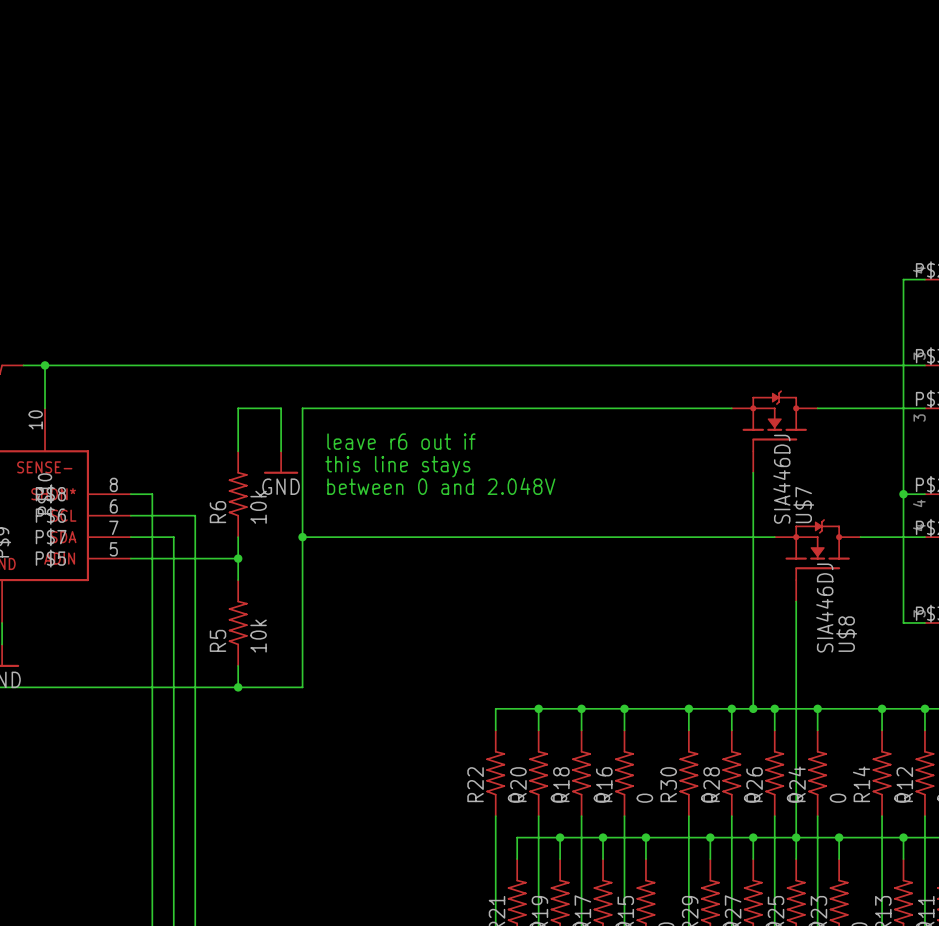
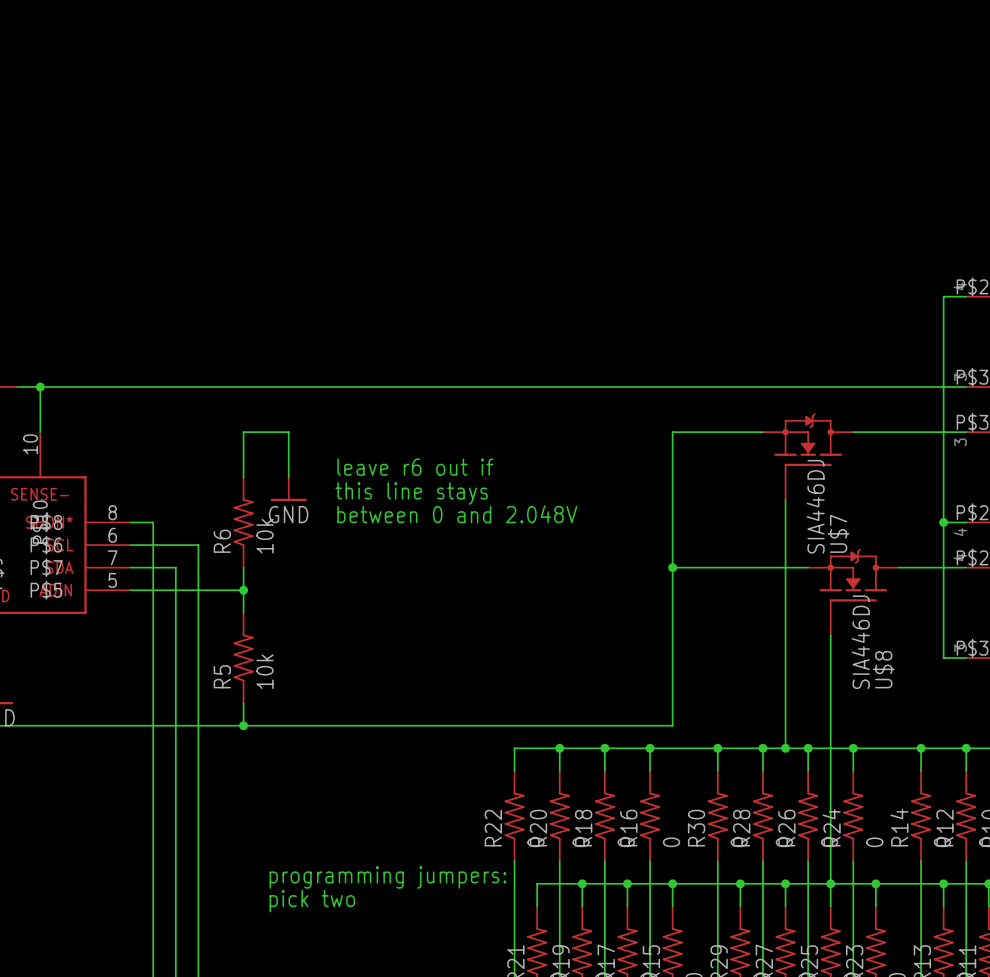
wire: (645, 408) (302, 408) (302, 687) -> (672, 432) (672, 725) (311, 725)
wire: (302, 537) (645, 537) -> none
junction: (302, 537) -> none
junction: none -> (672, 567)
text: none -> programming jumpers: (387, 877)
text: none -> pick two (312, 901)

